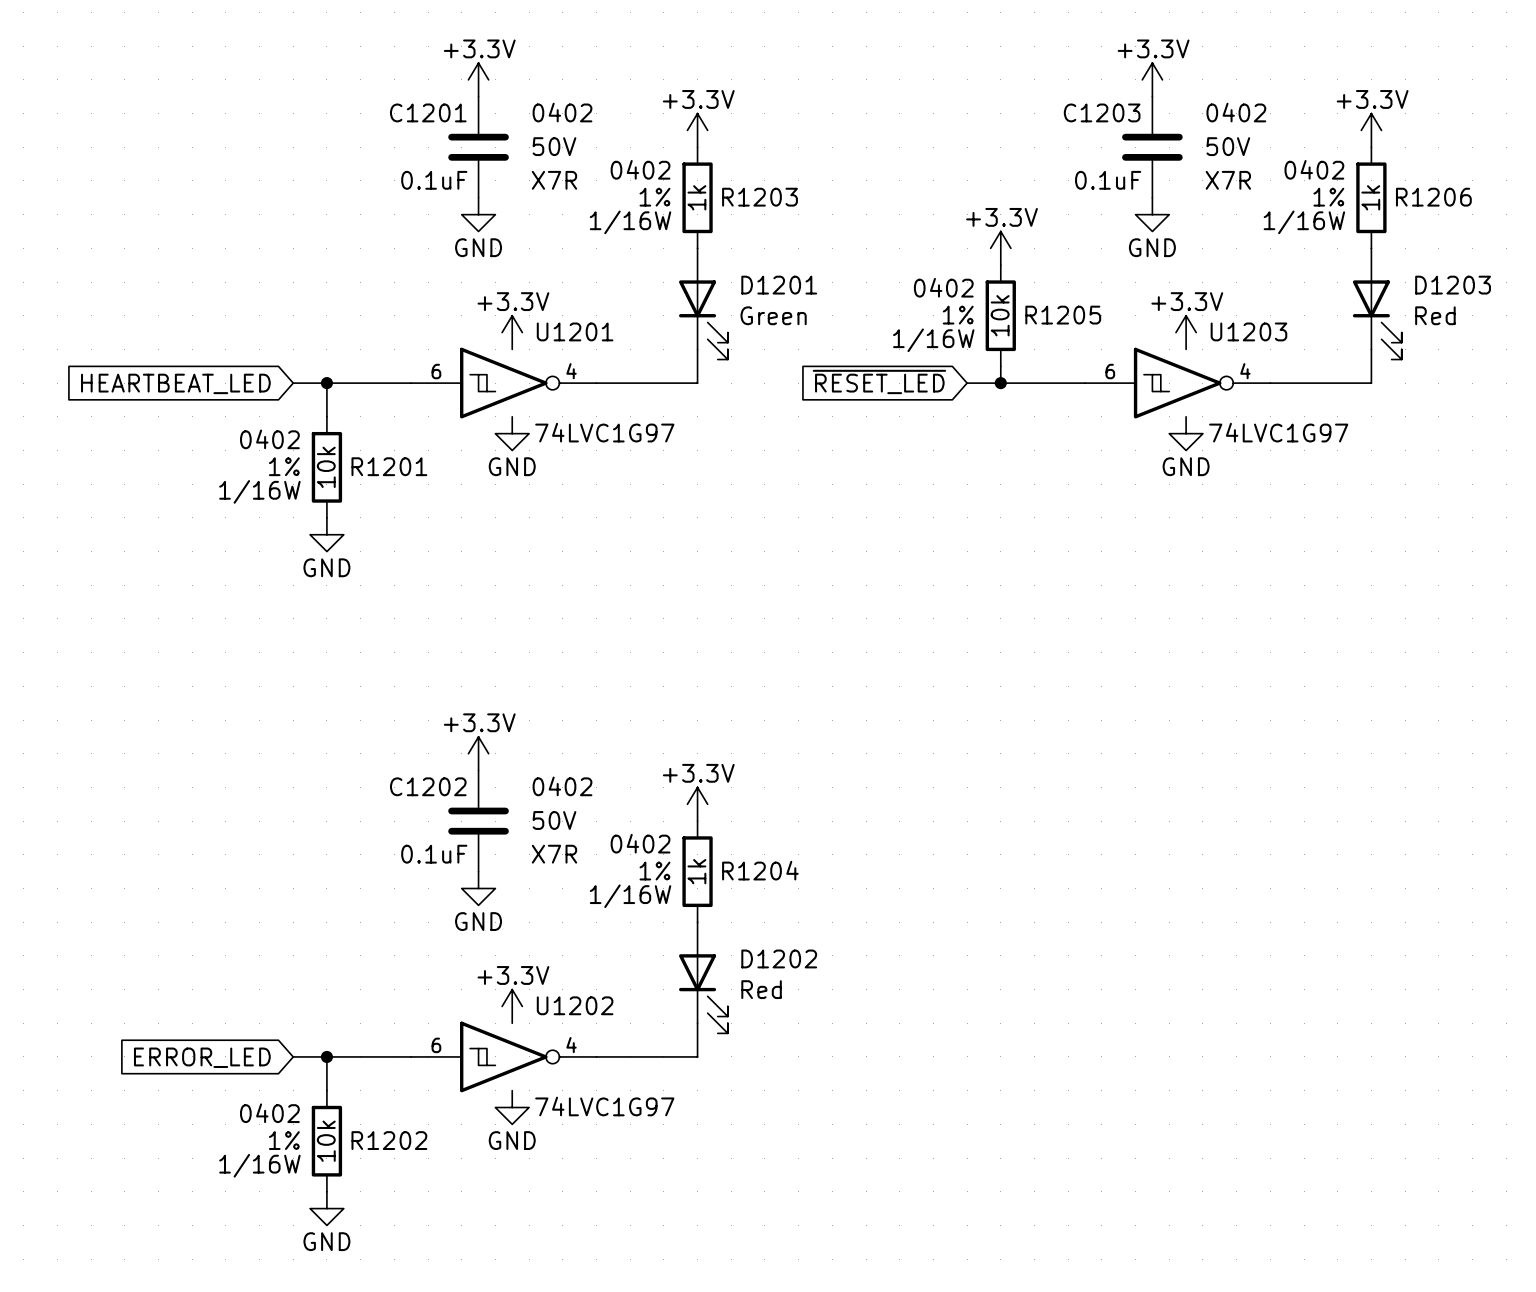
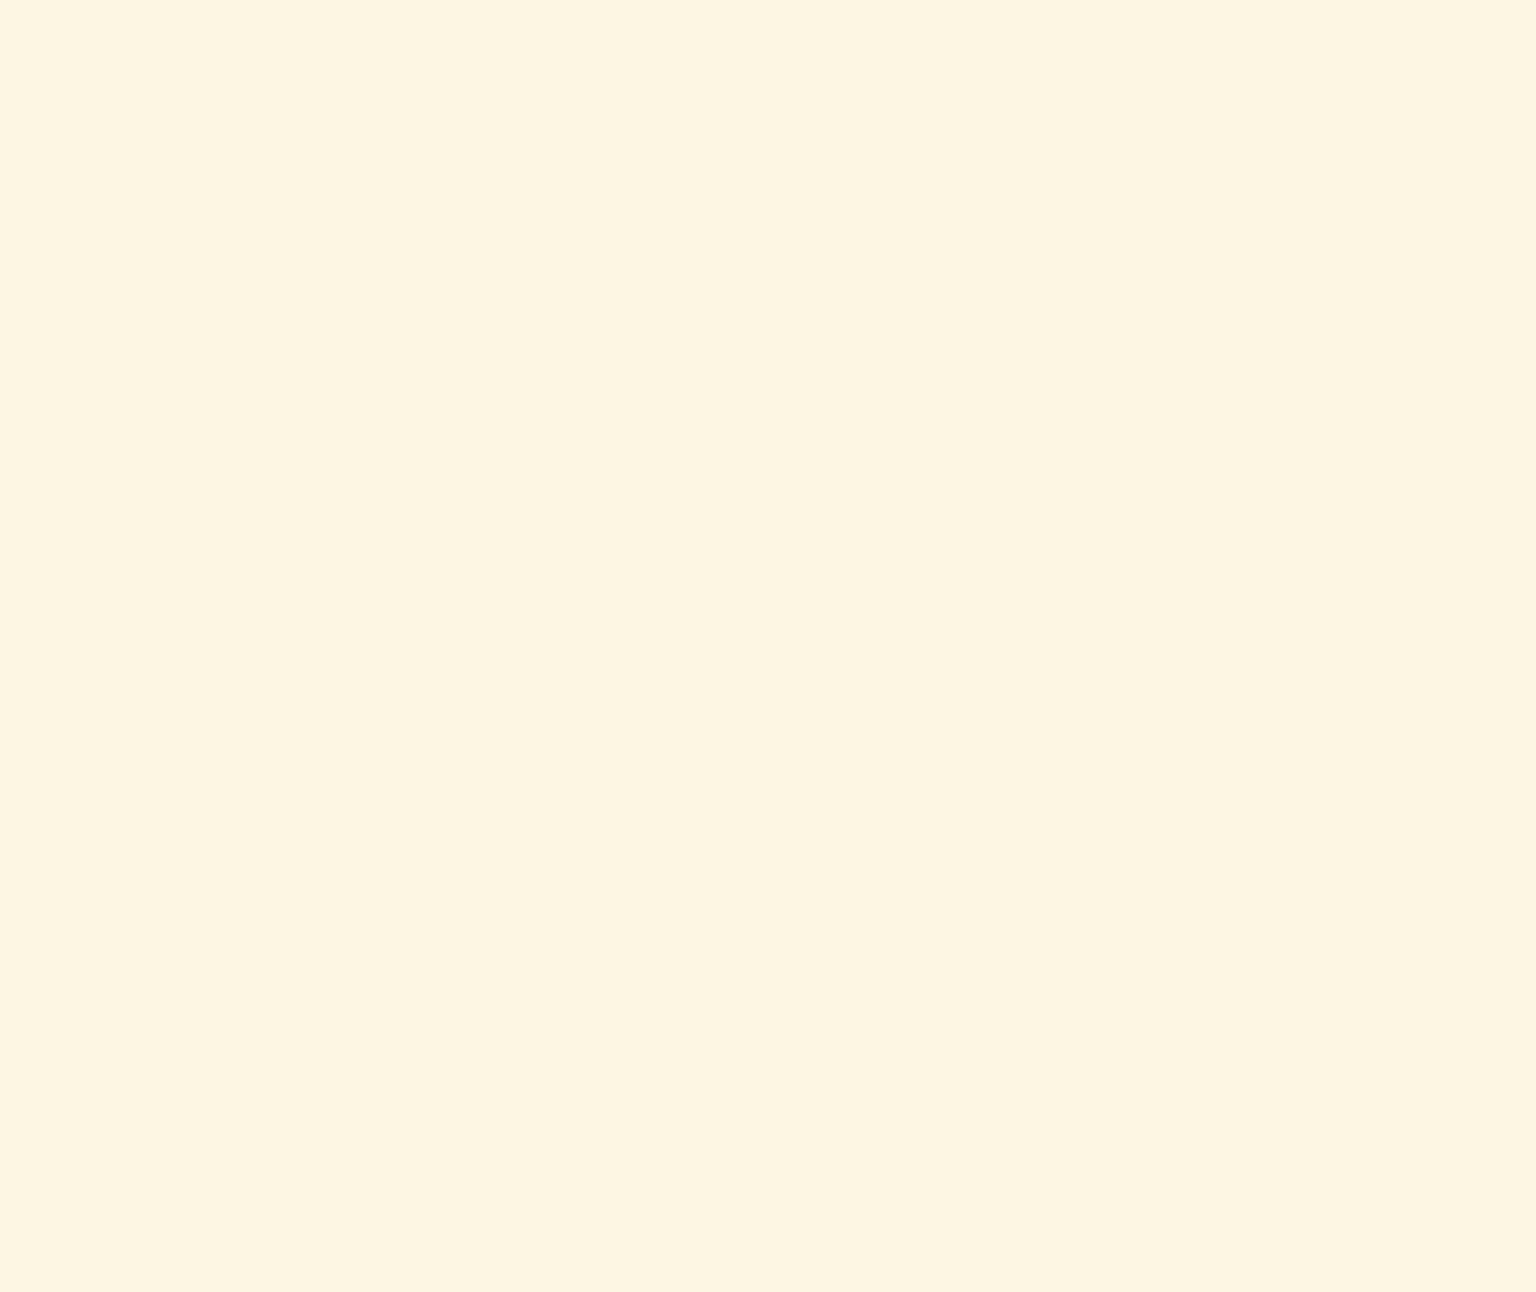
power symbol: +3.3V (478, 79) -> none
power symbol: +3.3V (1152, 79) -> none
power symbol: +3.3V (697, 130) -> none
power symbol: +3.3V (1371, 130) -> none
C1201: 0.1uF (478, 147) -> none
C1203: 0.1uF (1152, 147) -> none
R1203: 1k (697, 197) -> none
R1206: 1k (1371, 197) -> none
power symbol: GND (478, 214) -> none
power symbol: GND (1152, 214) -> none
power symbol: +3.3V (1000, 248) -> none
D1201: Green (703, 303) -> none
D1203: Red (1377, 303) -> none
R1205: 10k (1000, 315) -> none
power symbol: +3.3V (512, 332) -> none
power symbol: +3.3V (1186, 332) -> none
wire: (697, 349) (697, 383) (596, 383) -> none
wire: (1371, 349) (1371, 383) (1270, 383) -> none
wire: (1000, 366) (1000, 383) -> none
global label: ~{RESET_LED} (879, 381) -> none
global label: HEARTBEAT_LED (175, 383) -> none
wire: (293, 383) (411, 383) -> none
wire: (326, 383) (326, 416) -> none
junction: (326, 383) -> none
U1201: 74LVC1G97 (503, 383) -> none
wire: (967, 383) (1085, 383) -> none
junction: (1000, 383) -> none
U1203: 74LVC1G97 (1177, 383) -> none
power symbol: GND (512, 433) -> none
power symbol: GND (1186, 433) -> none
R1201: 10k (326, 467) -> none
power symbol: GND (326, 534) -> none
power symbol: +3.3V (478, 753) -> none
power symbol: +3.3V (697, 804) -> none
C1202: 0.1uF (478, 821) -> none
R1204: 1k (697, 871) -> none
power symbol: GND (478, 888) -> none
D1202: Red (703, 977) -> none
power symbol: +3.3V (512, 1006) -> none
wire: (697, 1023) (697, 1056) (596, 1056) -> none
wire: (293, 1056) (411, 1056) -> none
wire: (326, 1056) (326, 1090) -> none
junction: (326, 1056) -> none
U1202: 74LVC1G97 (503, 1056) -> none
global label: ERROR_LED (202, 1057) -> none
power symbol: GND (512, 1107) -> none
R1202: 10k (326, 1141) -> none
power symbol: GND (326, 1208) -> none

